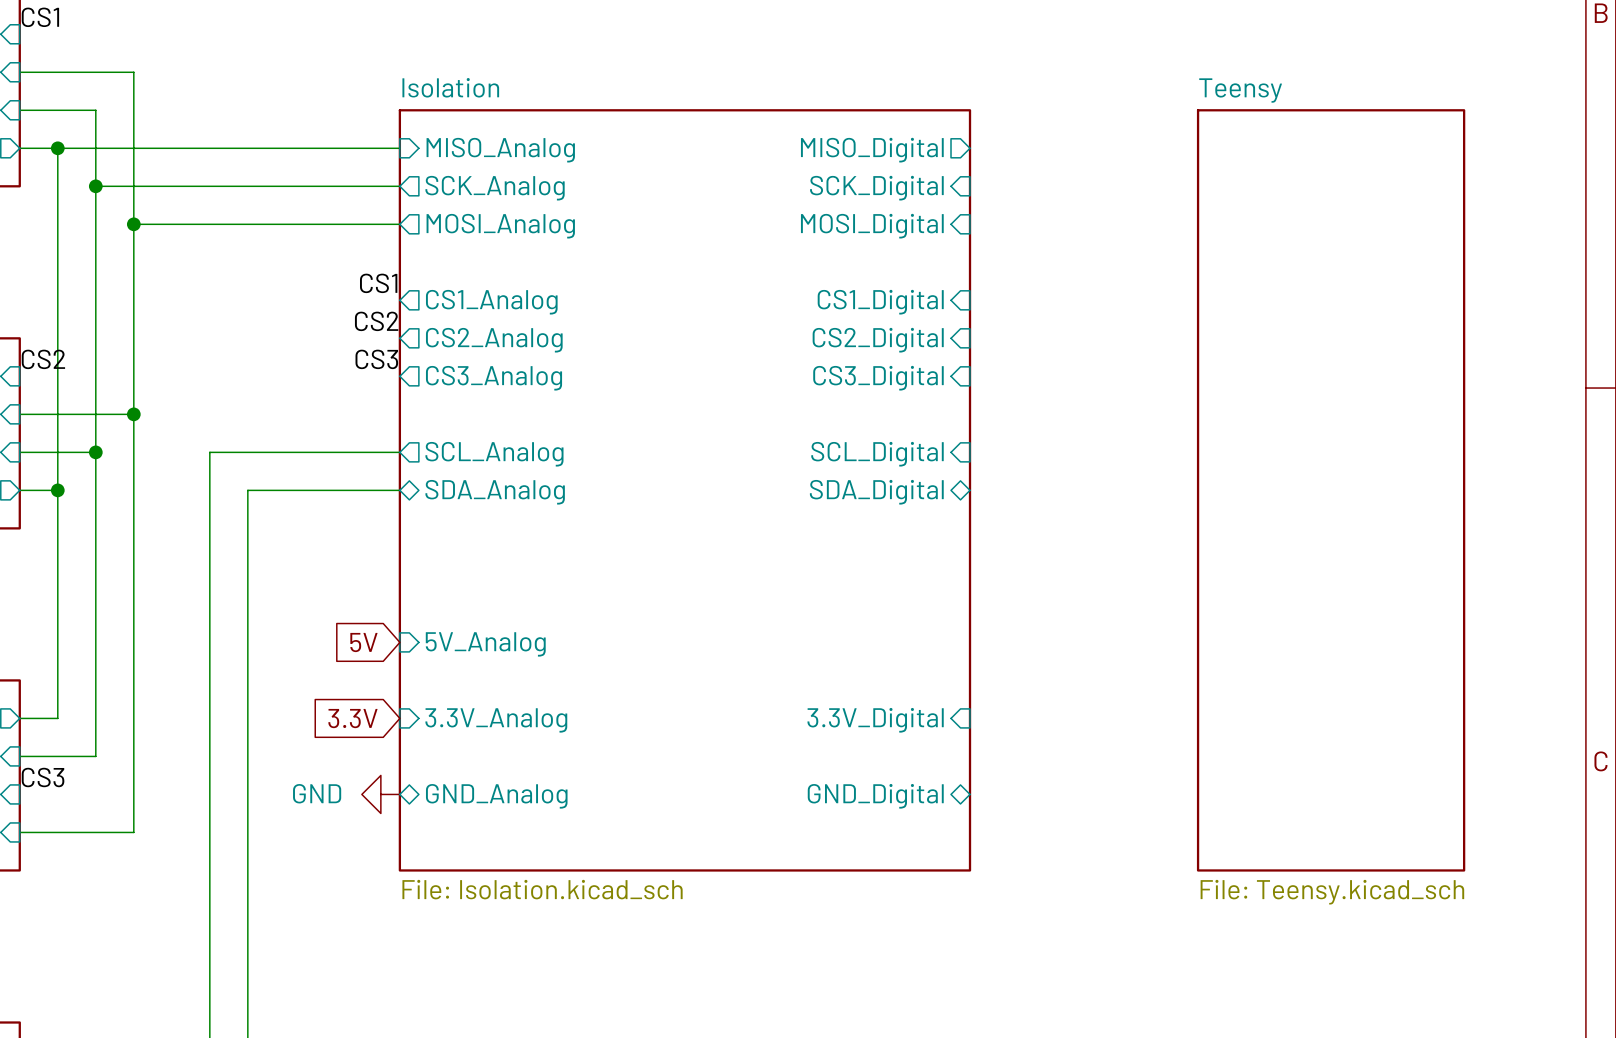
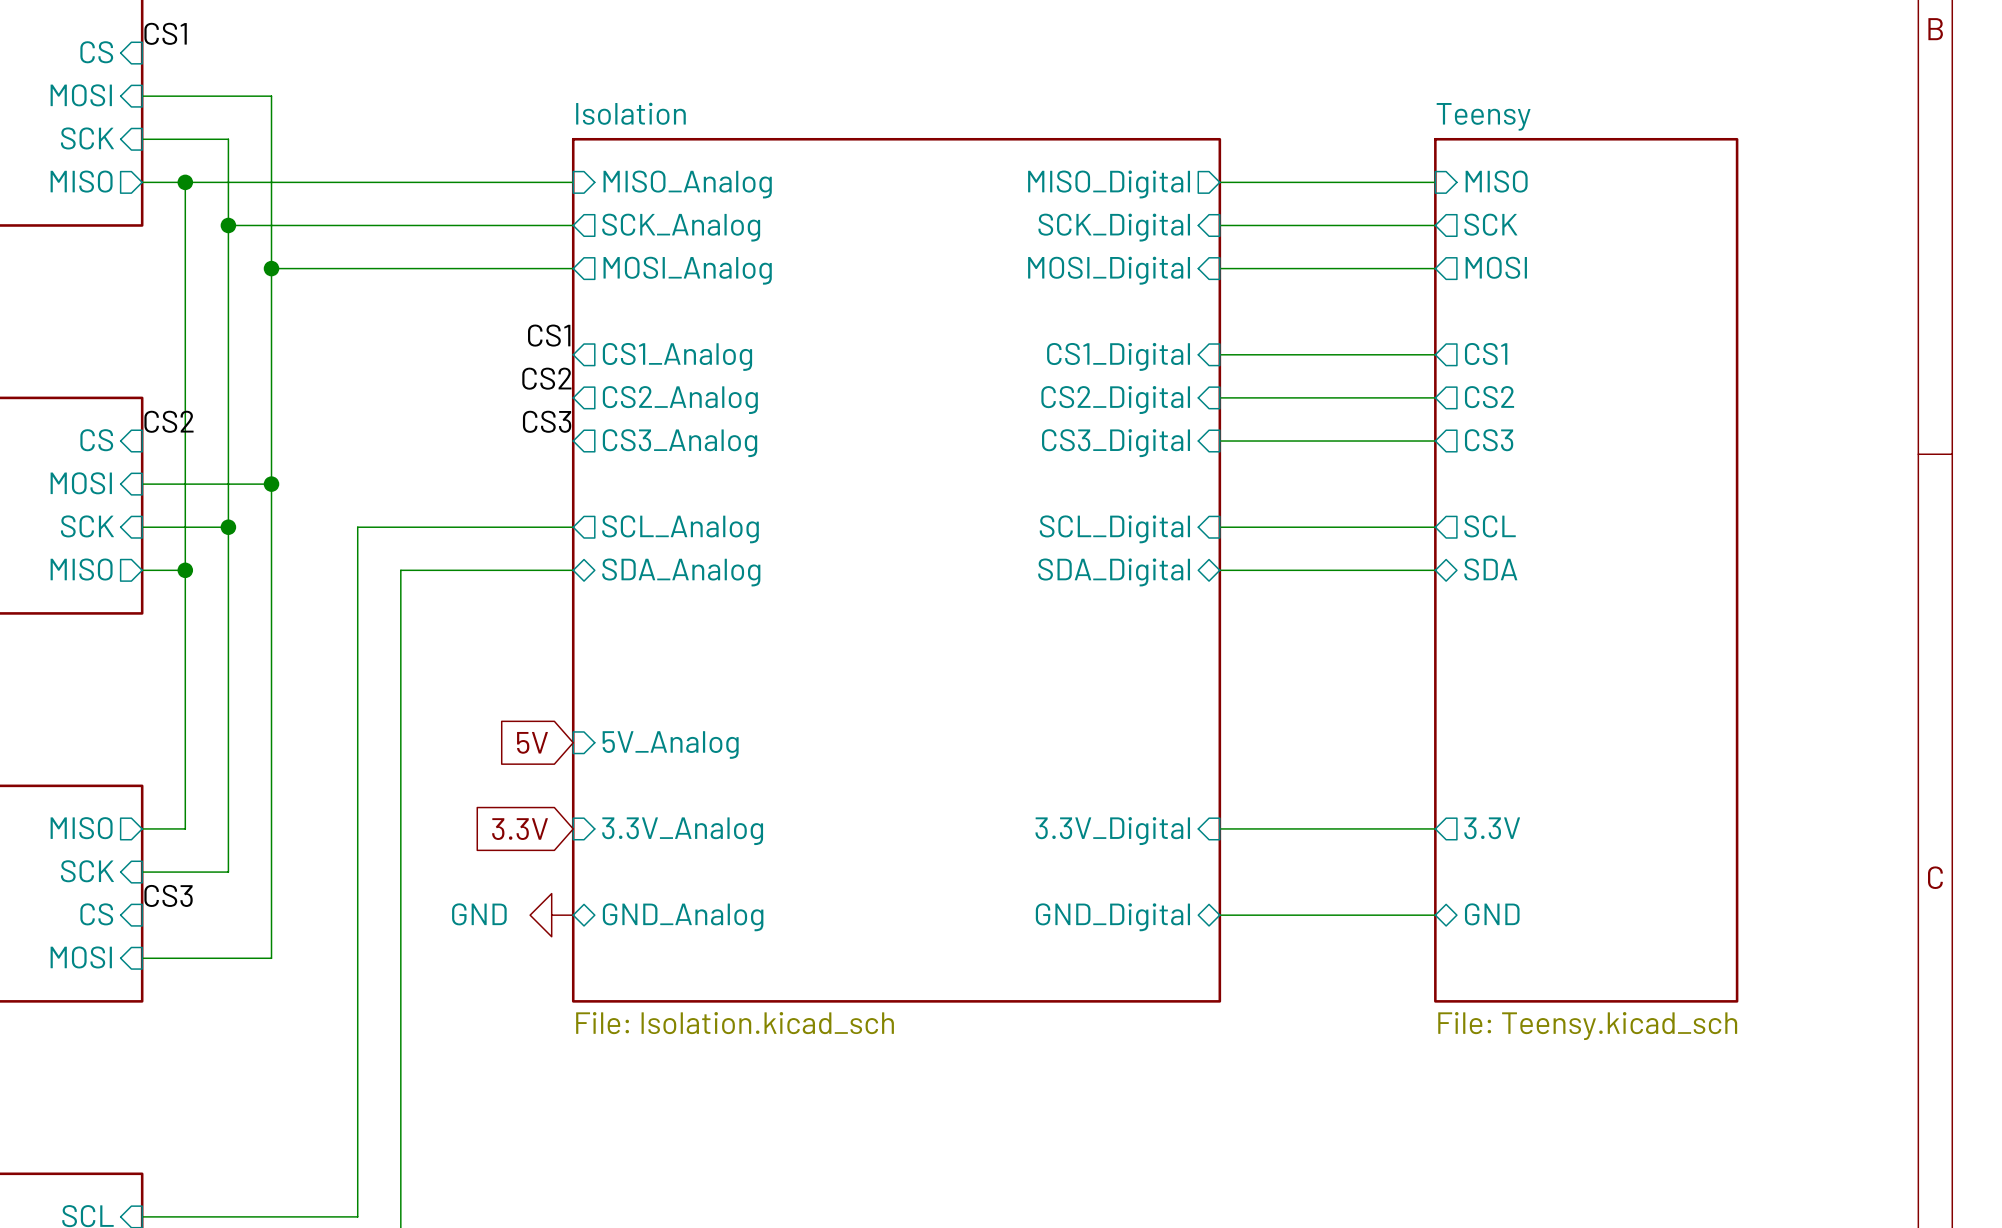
sheet pin: none -> MISO (1496, 181)
wire: none -> (1219, 182) (1435, 182)
sheet pin: none -> SCK (1490, 224)
wire: none -> (1219, 225) (1435, 225)
sheet pin: none -> MOSI (1496, 267)
wire: none -> (1219, 268) (1435, 268)
sheet pin: none -> CS1 (1486, 354)
wire: none -> (1219, 354) (1435, 354)
sheet pin: none -> CS2 (1489, 397)
wire: none -> (1219, 397) (1435, 397)
sheet pin: none -> CS3 (1489, 440)
wire: none -> (1219, 441) (1435, 441)
sheet pin: none -> SCL (1490, 526)
wire: none -> (1219, 527) (1435, 527)
sheet pin: none -> SDA (1490, 569)
wire: none -> (1219, 570) (1435, 570)
sheet Teensy position: (1331, 490) -> (1586, 570)
sheet pin: none -> 3.3V (1492, 828)
wire: none -> (1219, 828) (1435, 828)
sheet pin: none -> GND (1492, 914)
wire: none -> (1219, 915) (1435, 915)

